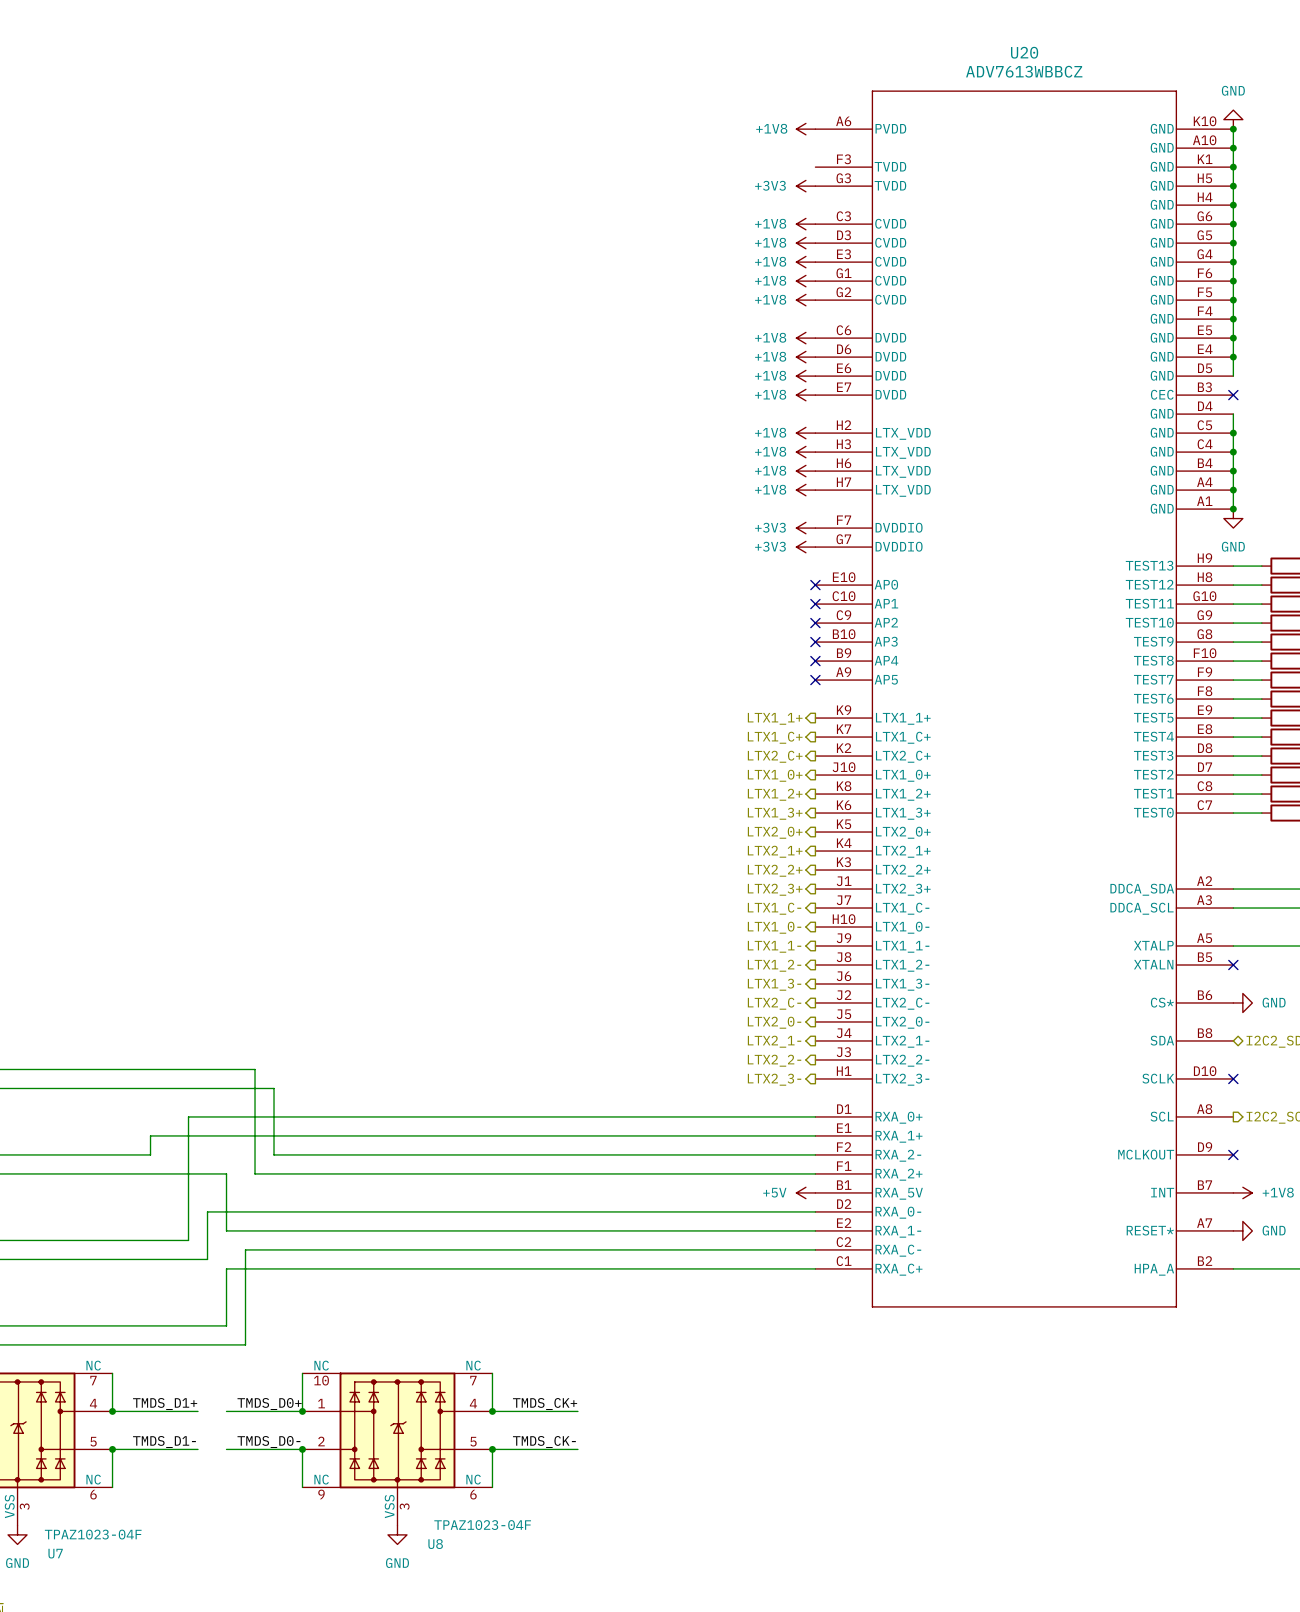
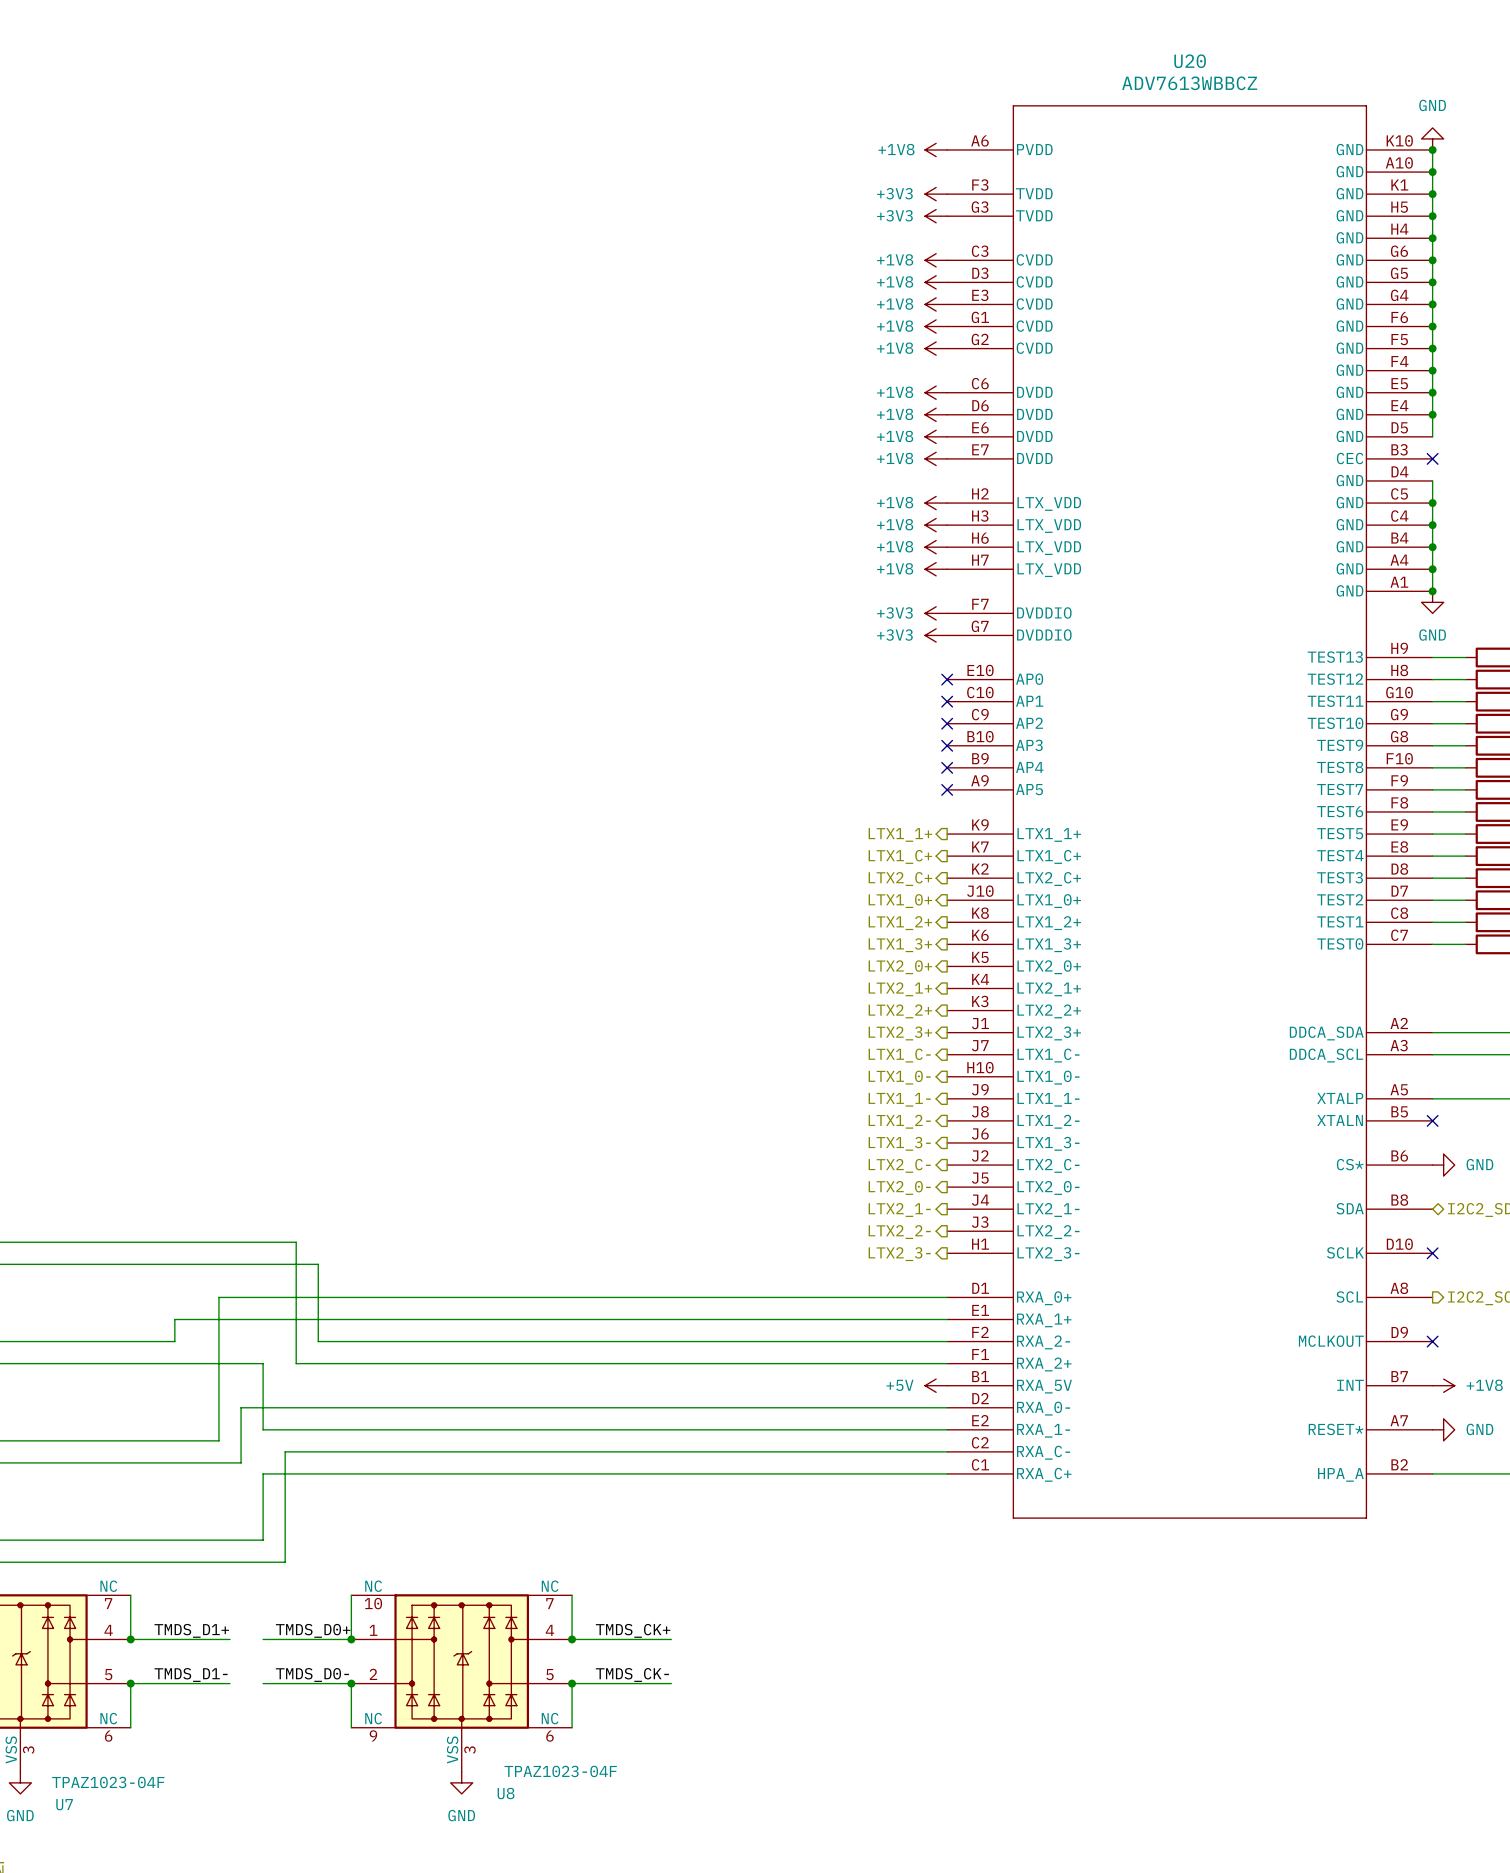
power symbol: none -> +3V3 (936, 194)

